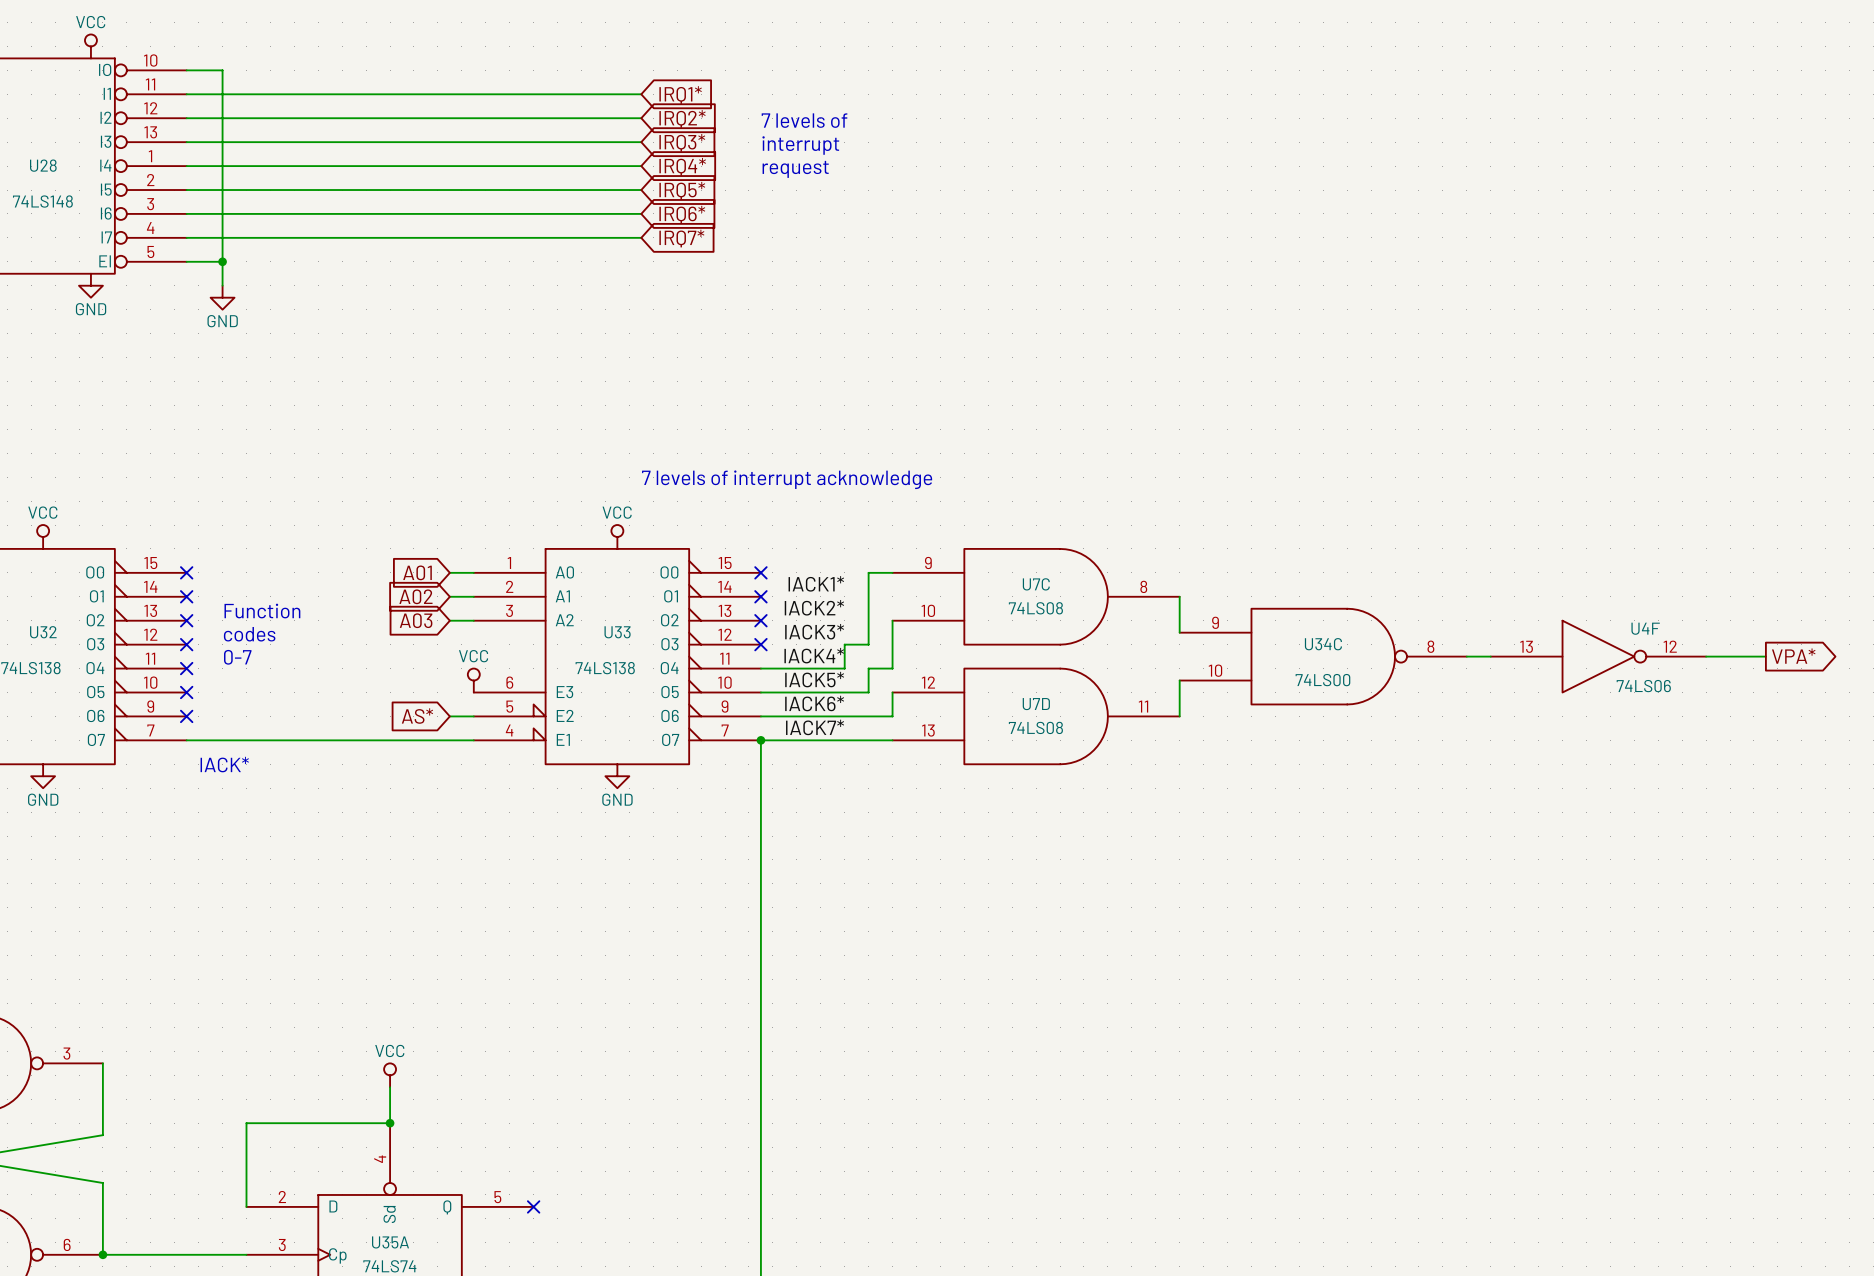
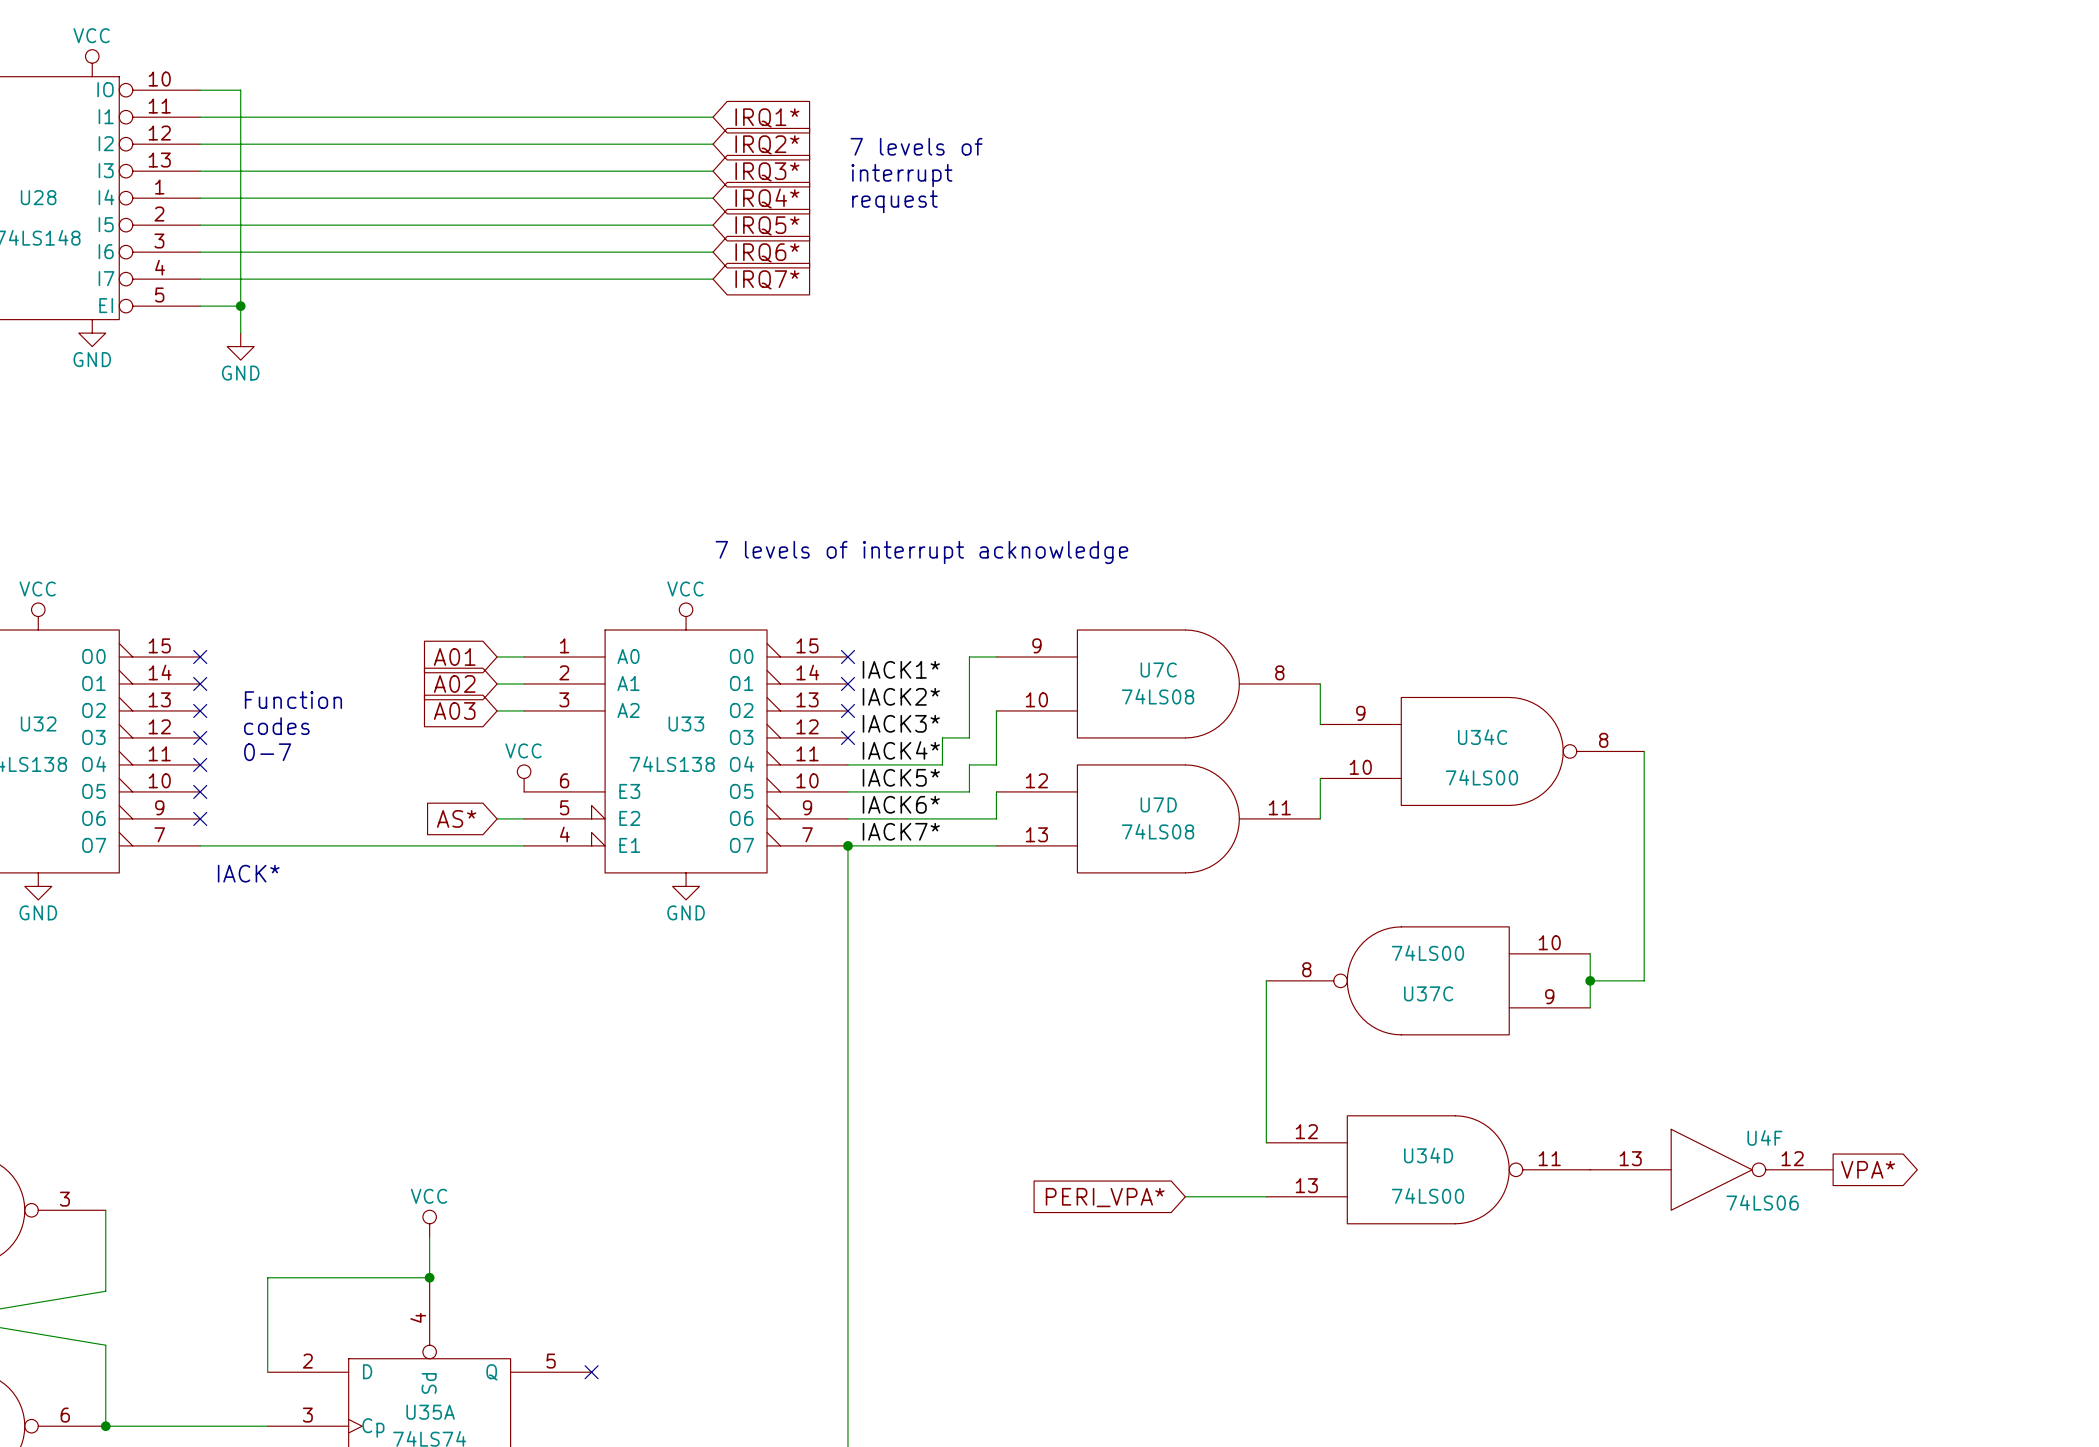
wire: (1466, 656) (1490, 656) -> (1644, 751) (1644, 980) (1590, 980)
U4F position: (1598, 656) -> (1711, 1169)
wire: (1706, 656) (1765, 656) -> none
global label: VPA* (1793, 656) -> none
wire: none -> (1590, 953) (1590, 1007)
wire: none -> (1266, 980) (1266, 1142)
U37C: none -> 74LS00 (1428, 980)
junction: none -> (1590, 980)
U34D: none -> 74LS00 (1428, 1169)
global label: none -> VPA* (1868, 1169)
global label: none -> PERI_VPA* (1105, 1197)
wire: none -> (1185, 1196) (1266, 1196)

